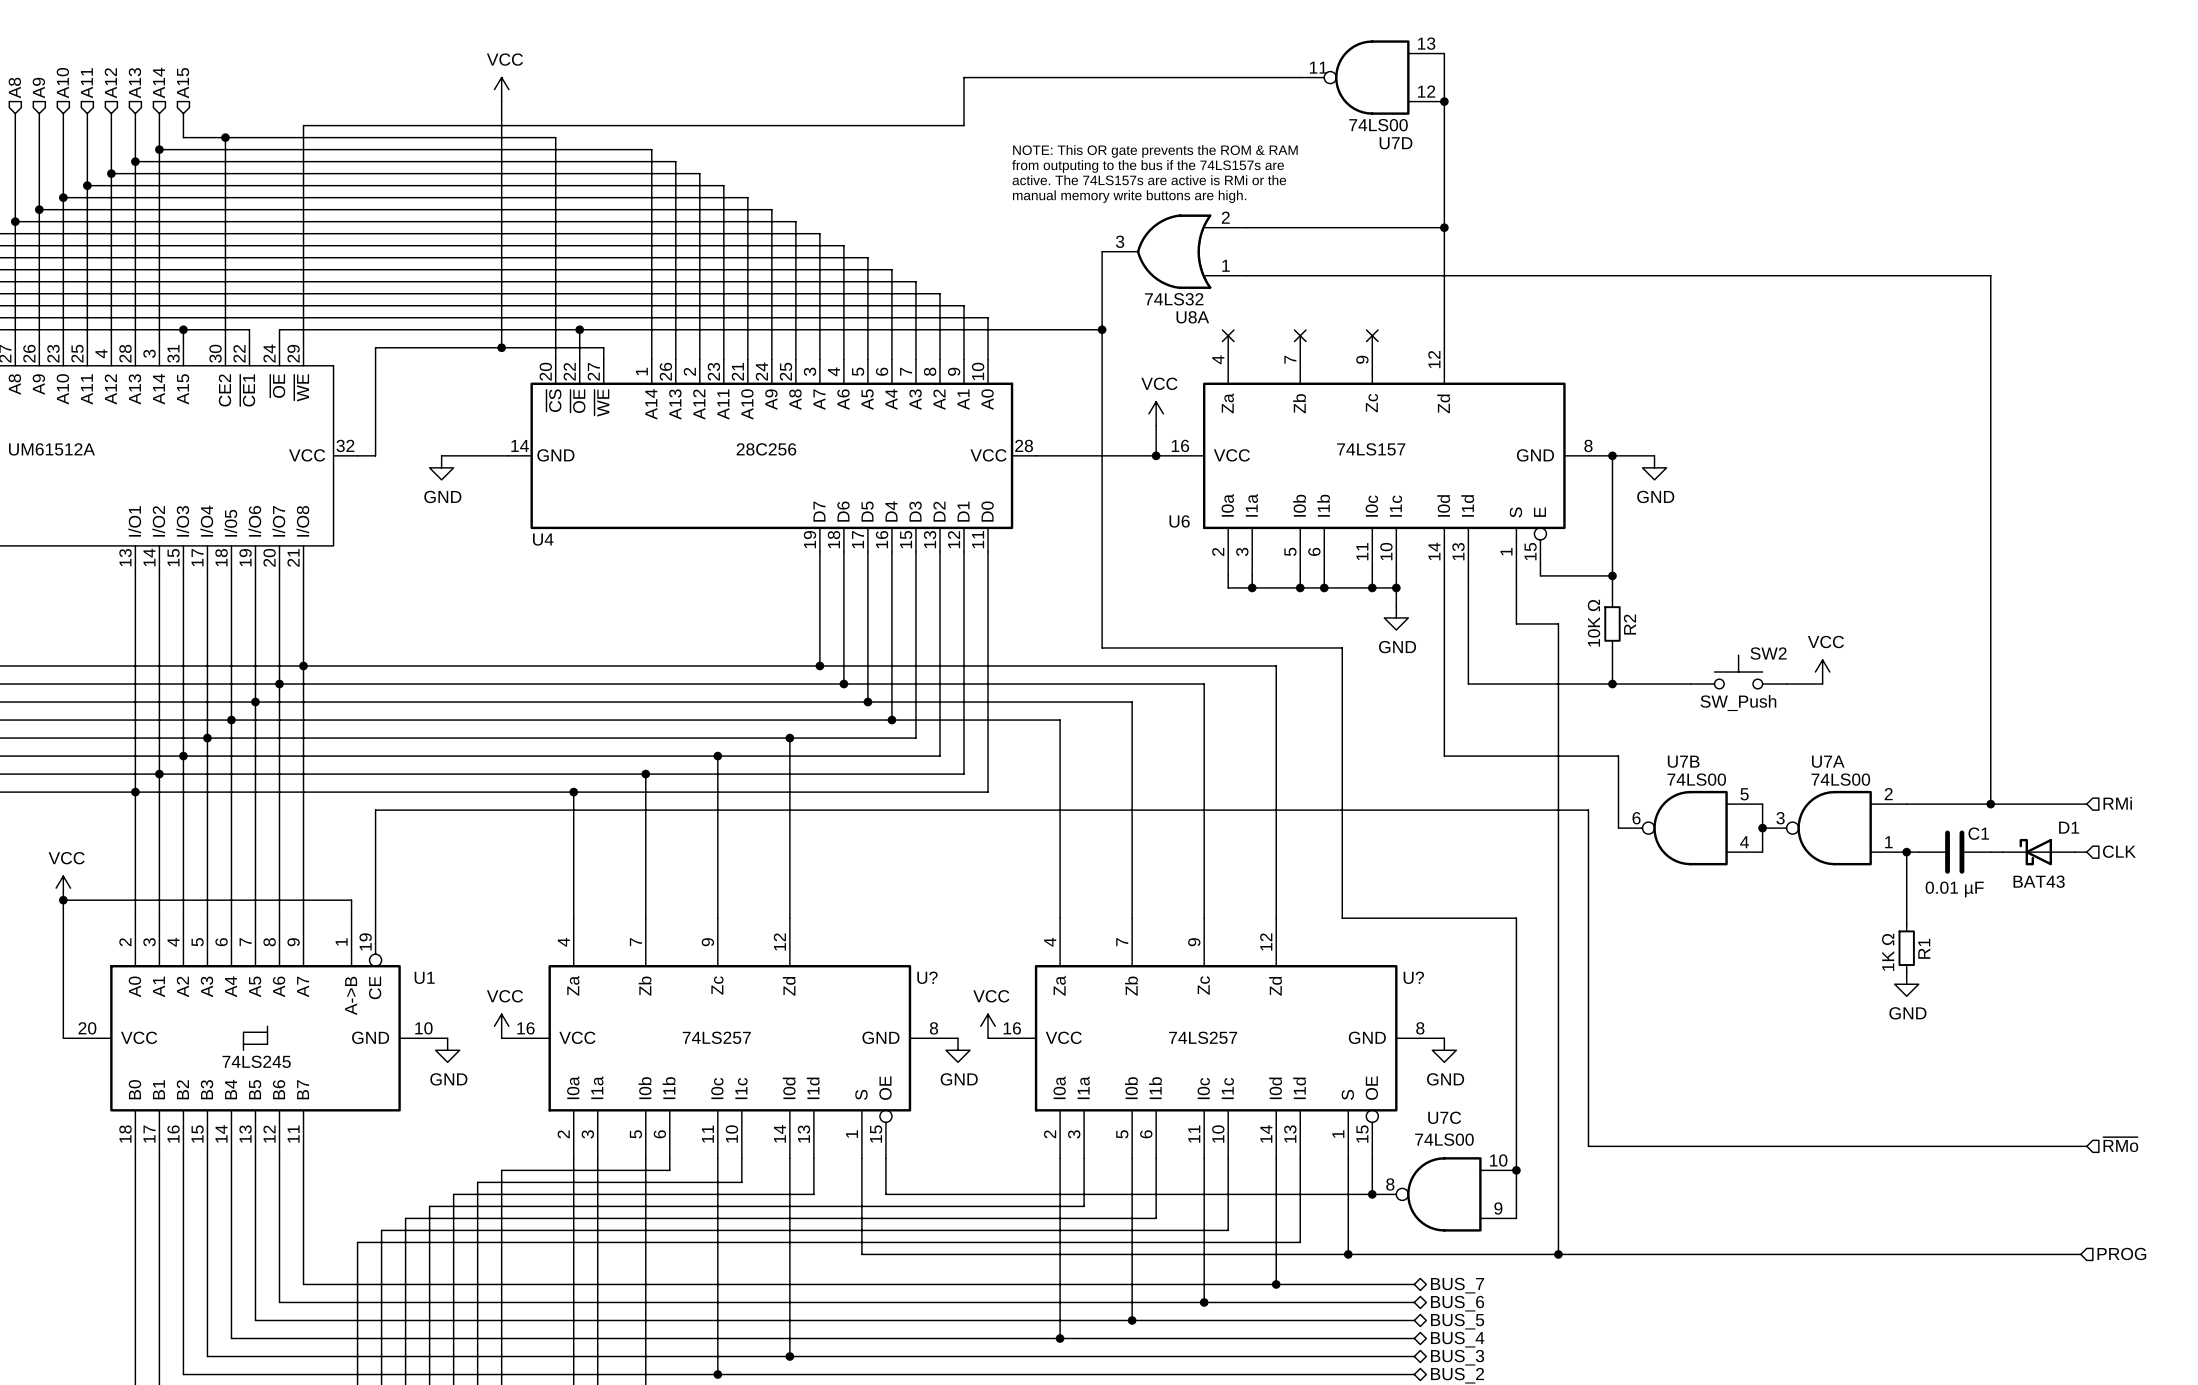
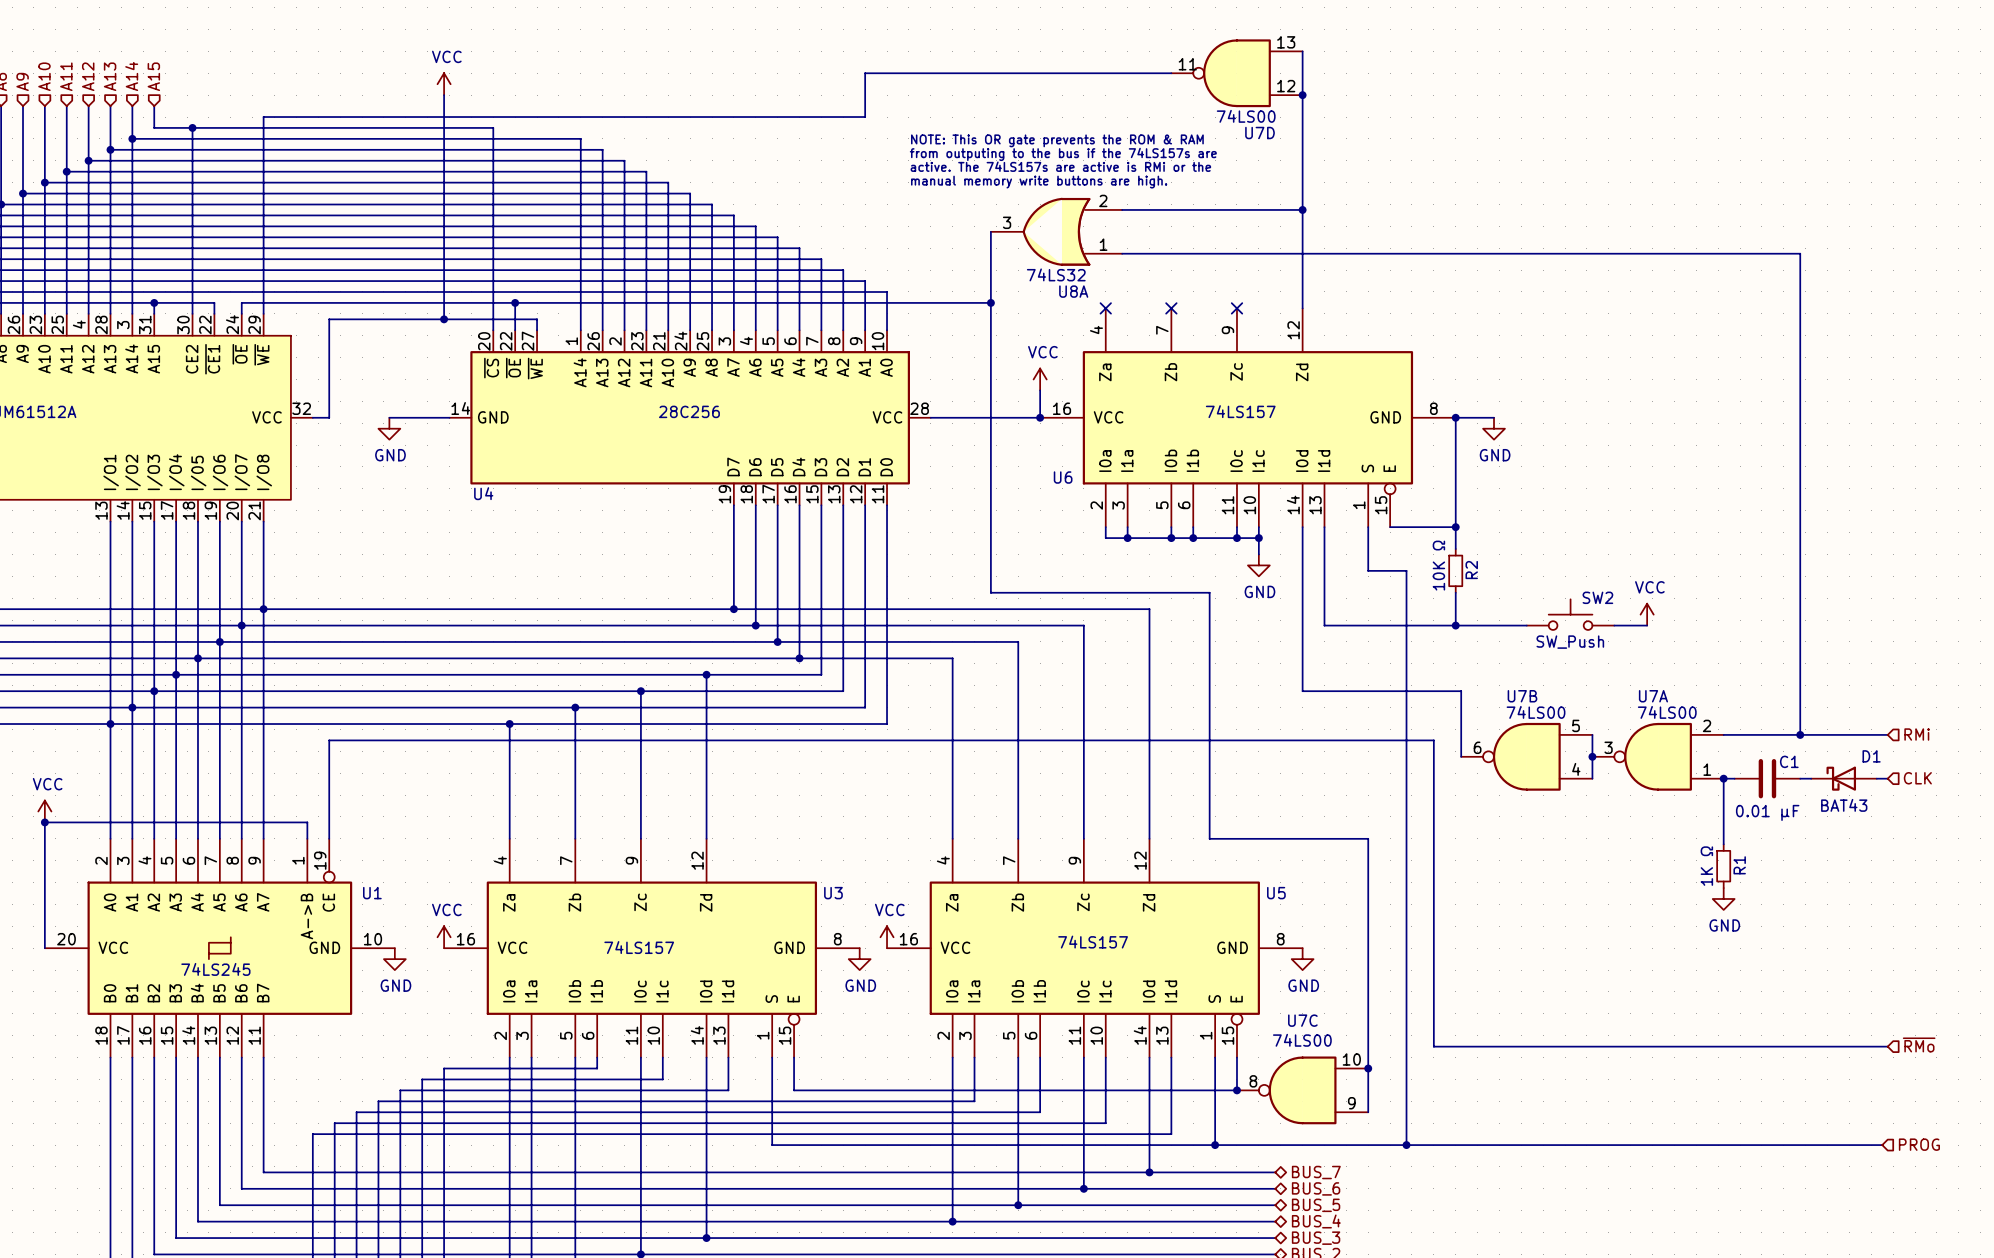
U? name: U? (927, 977) -> U3 (833, 893)
U? name: U? (1413, 977) -> U5 (1276, 893)
U? value: 74LS257 (716, 1037) -> 74LS157 (639, 947)
U? value: 74LS257 (1203, 1037) -> 74LS157 (1093, 942)
U? pin name: OE (885, 1088) -> E (793, 999)
U? pin name: OE (1371, 1088) -> E (1236, 999)

